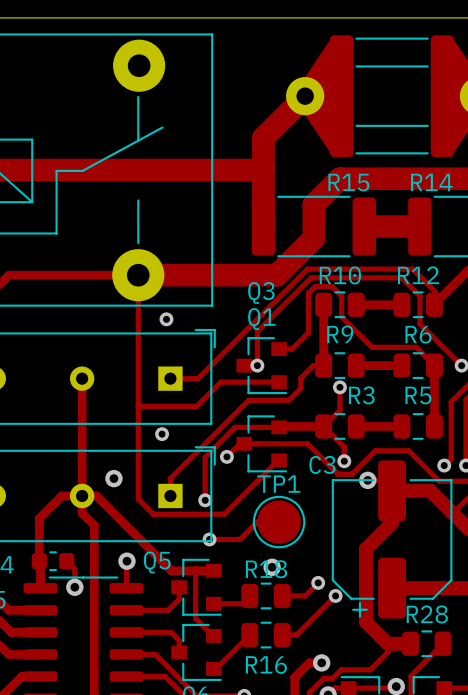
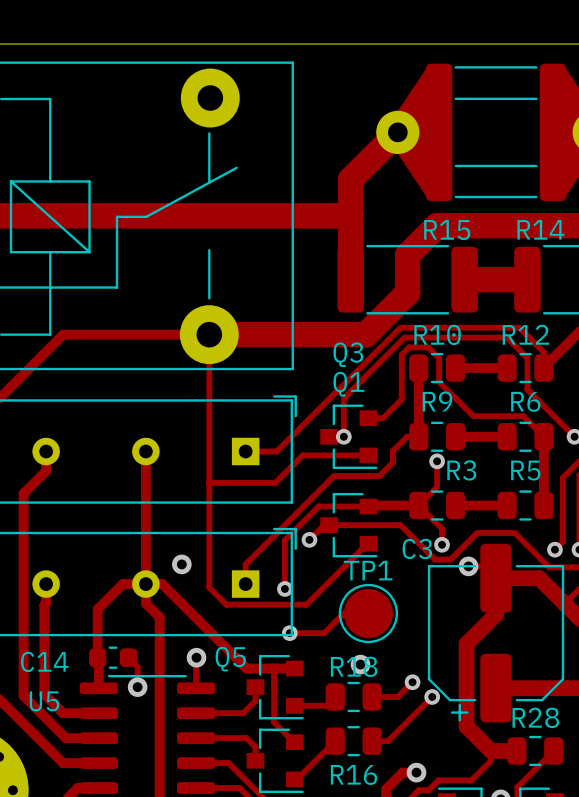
via: (166, 319) -> none
via: (162, 434) -> none

